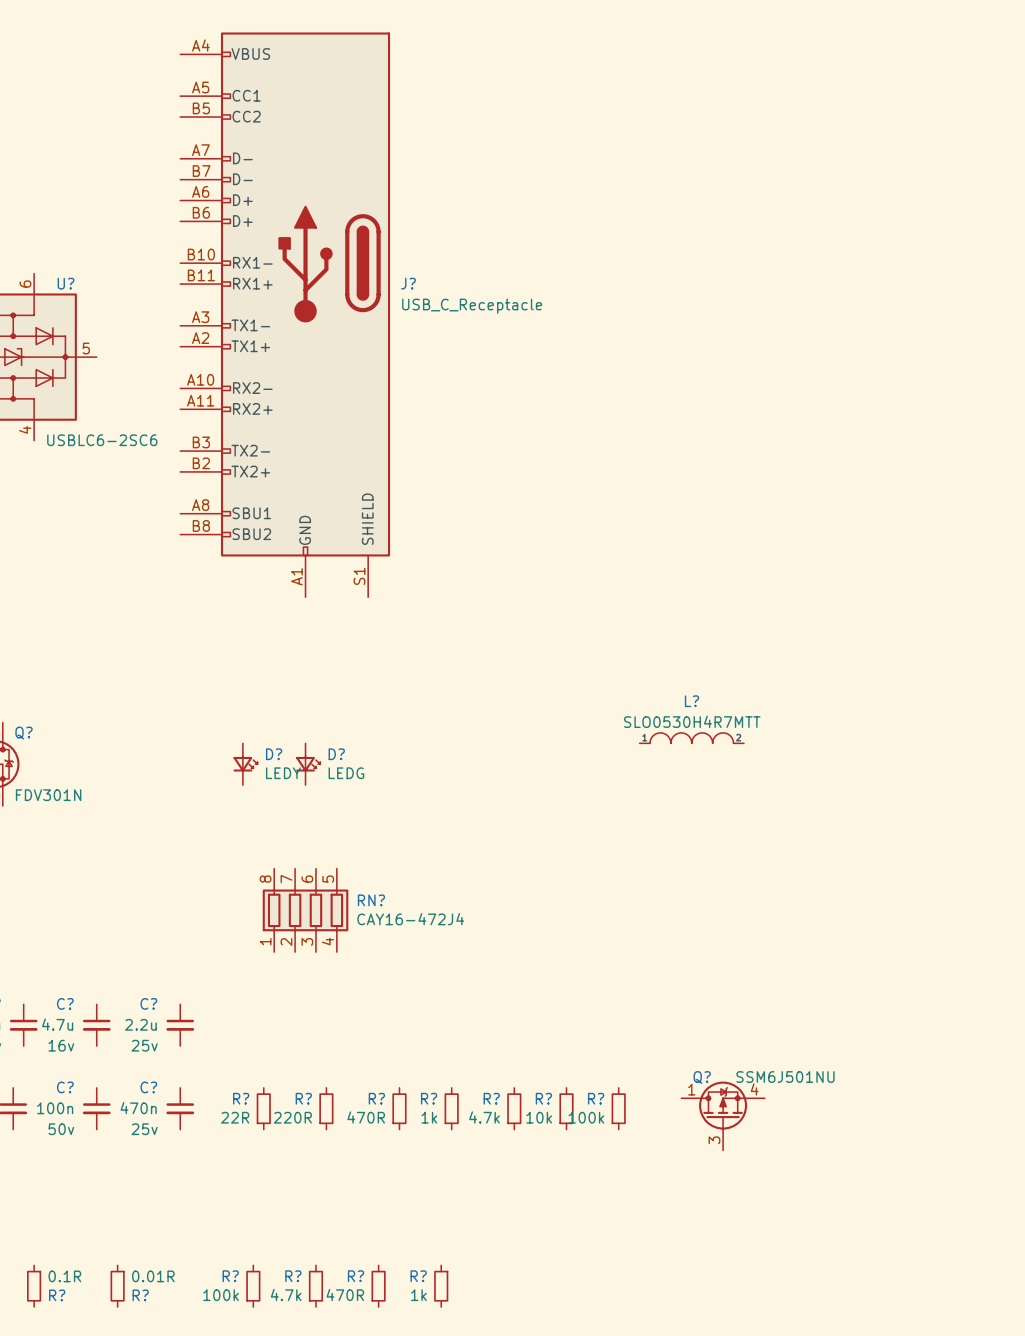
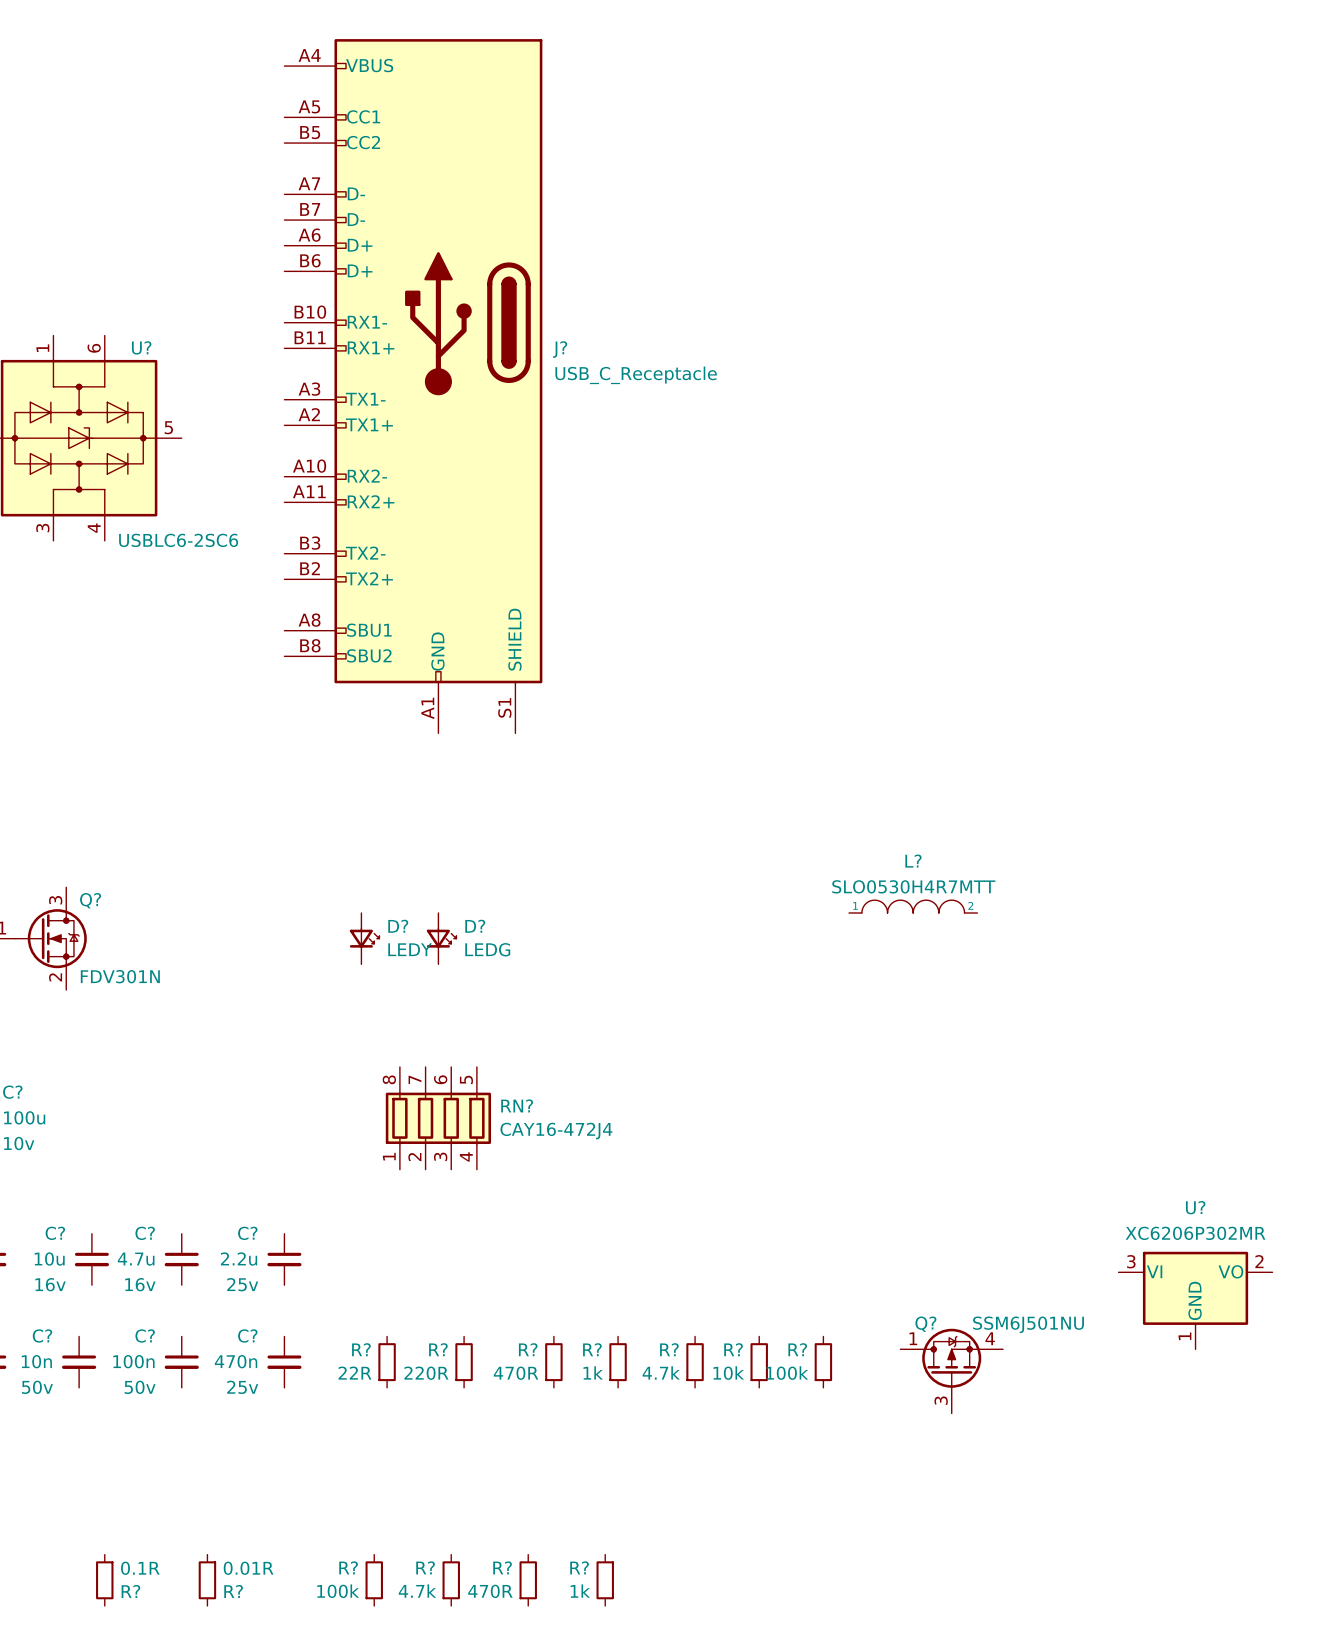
U?: none -> XC6206P302MR (1195, 1300)

